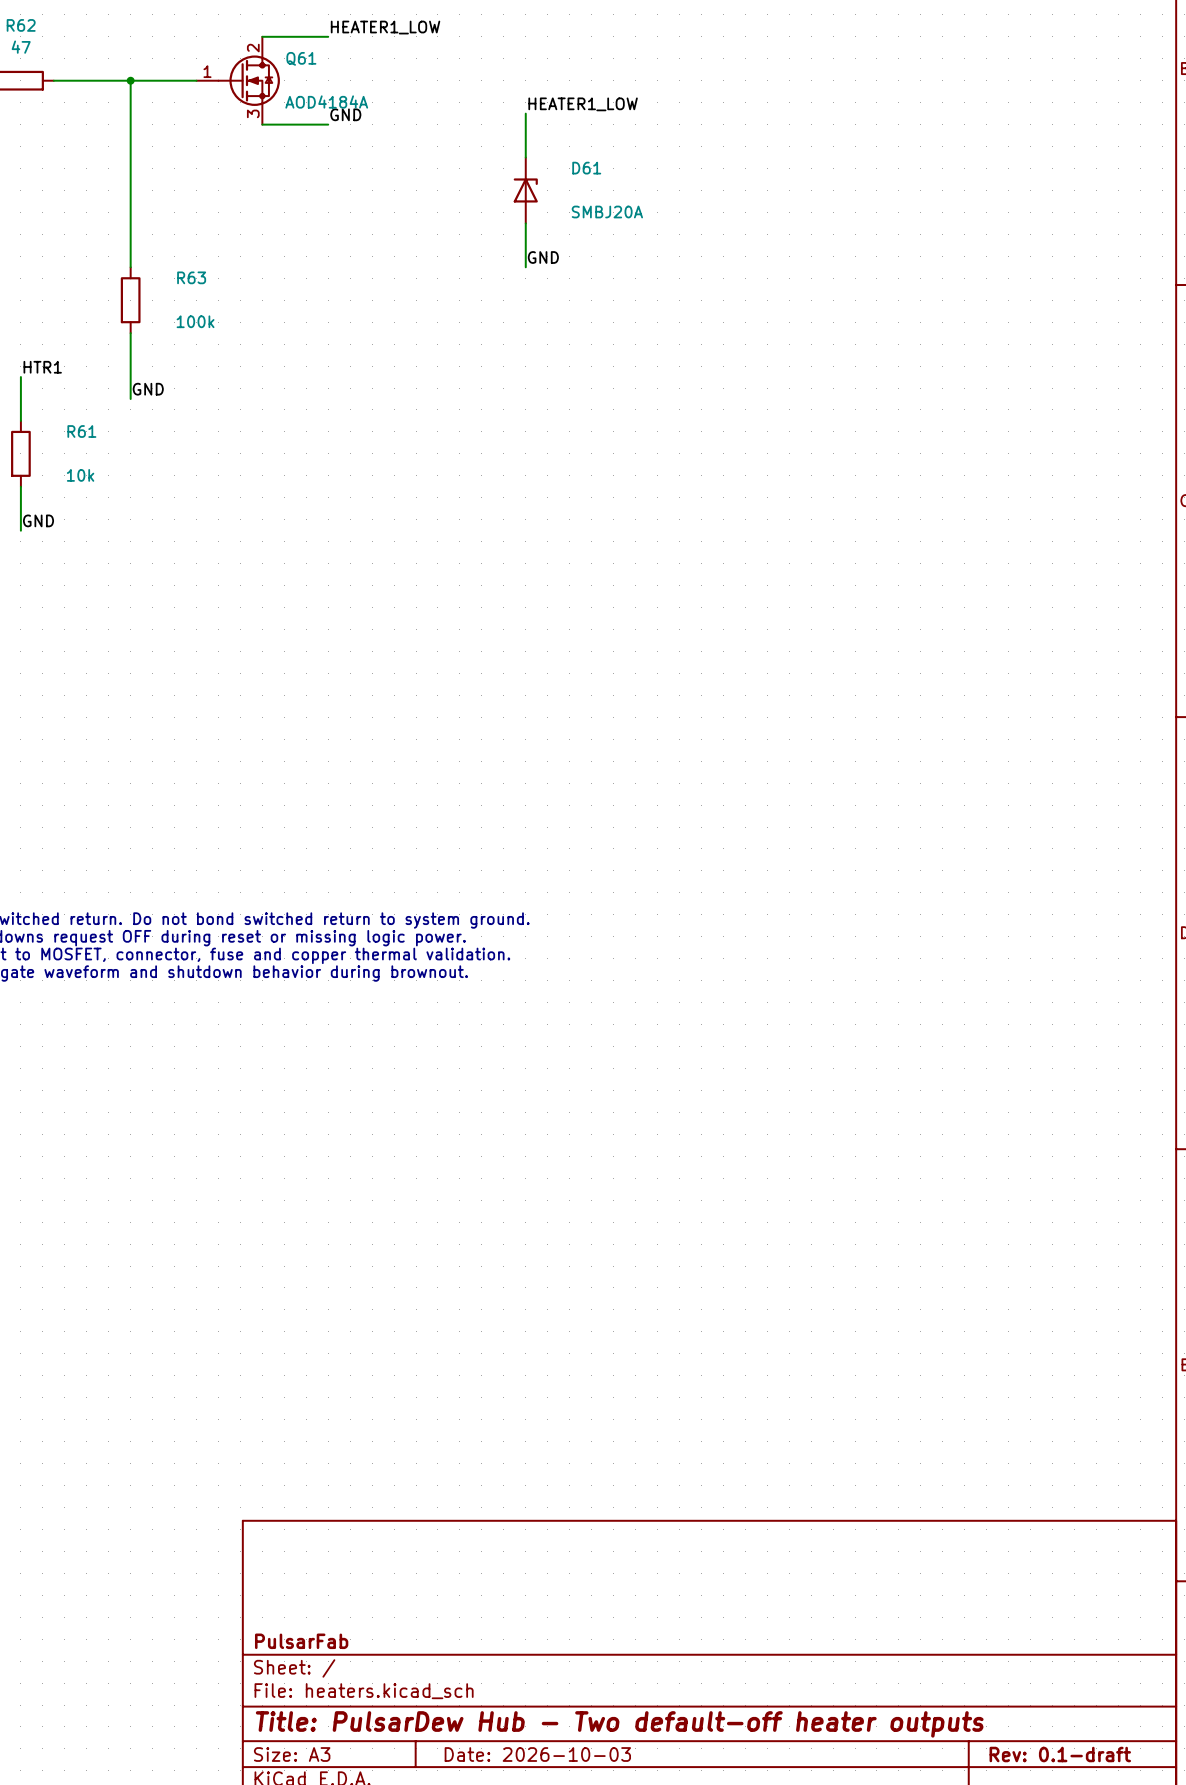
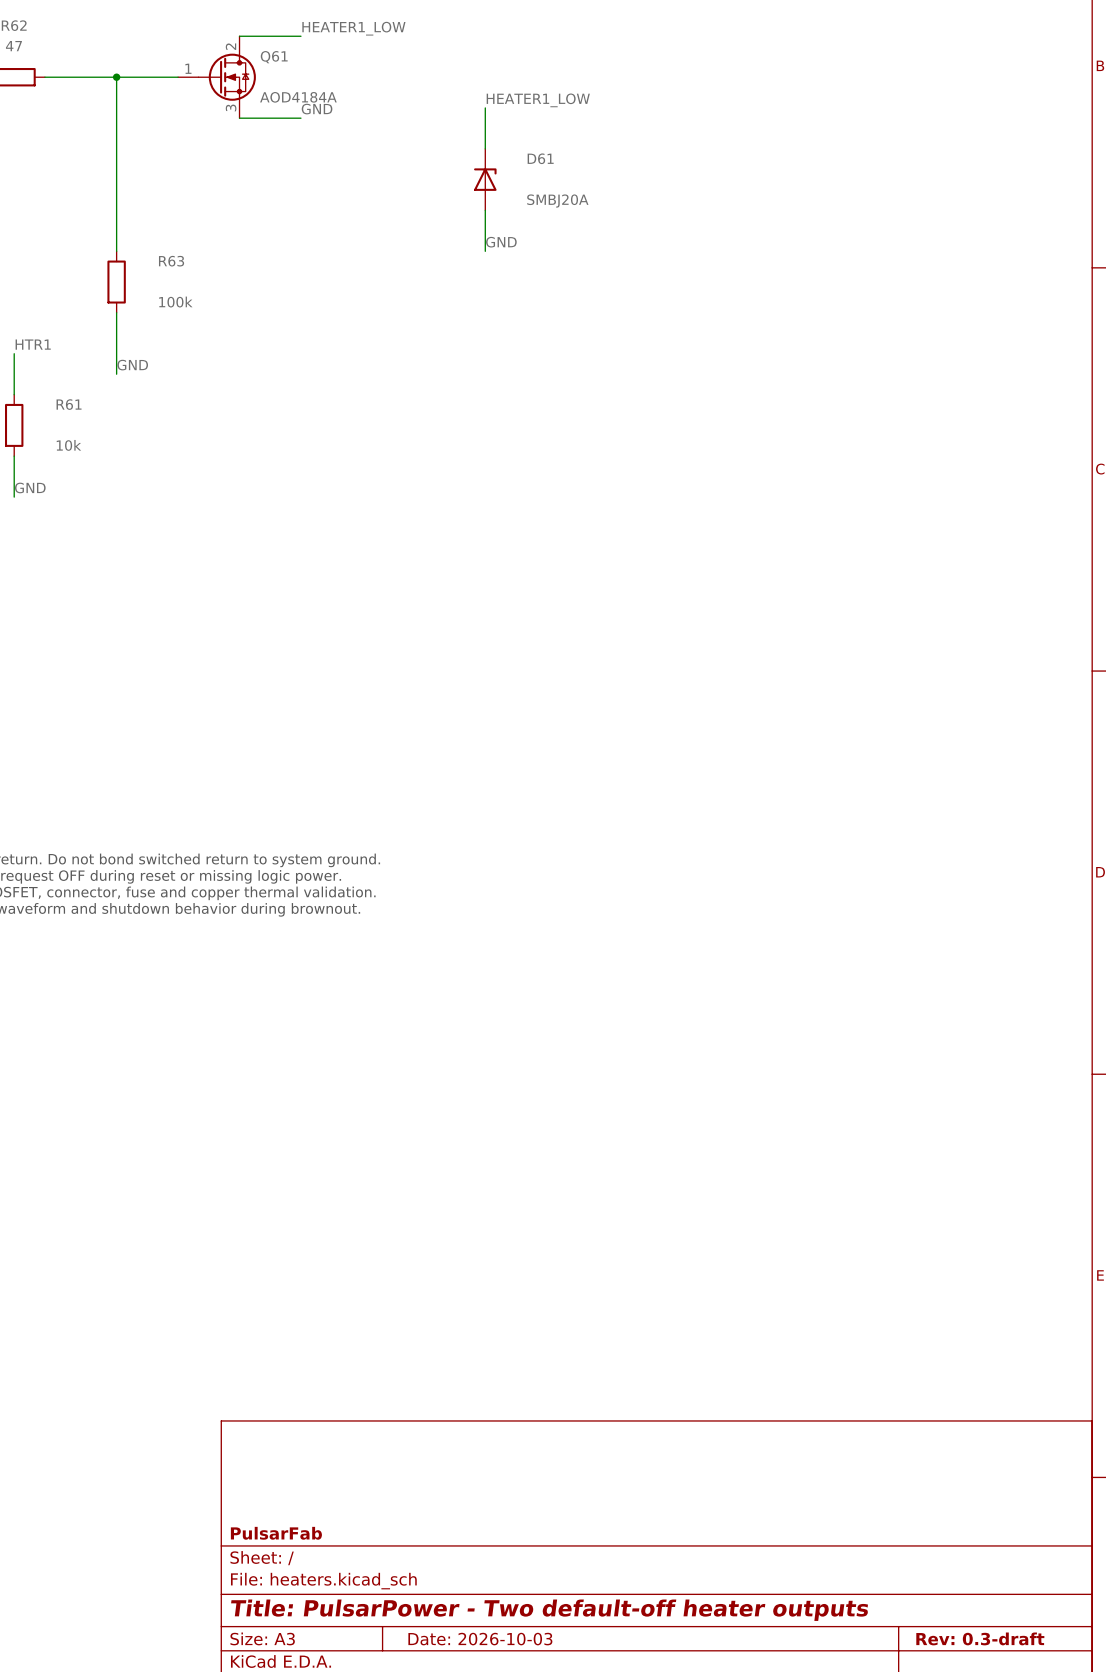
title block: Title: PulsarDew Hub - Two default-off heater outputs (619, 1724) -> Title: PulsarPower - Two default-off heater outputs (549, 1610)
title block: Rev: 0.1-draft (1060, 1754) -> Rev: 0.3-draft (980, 1638)

